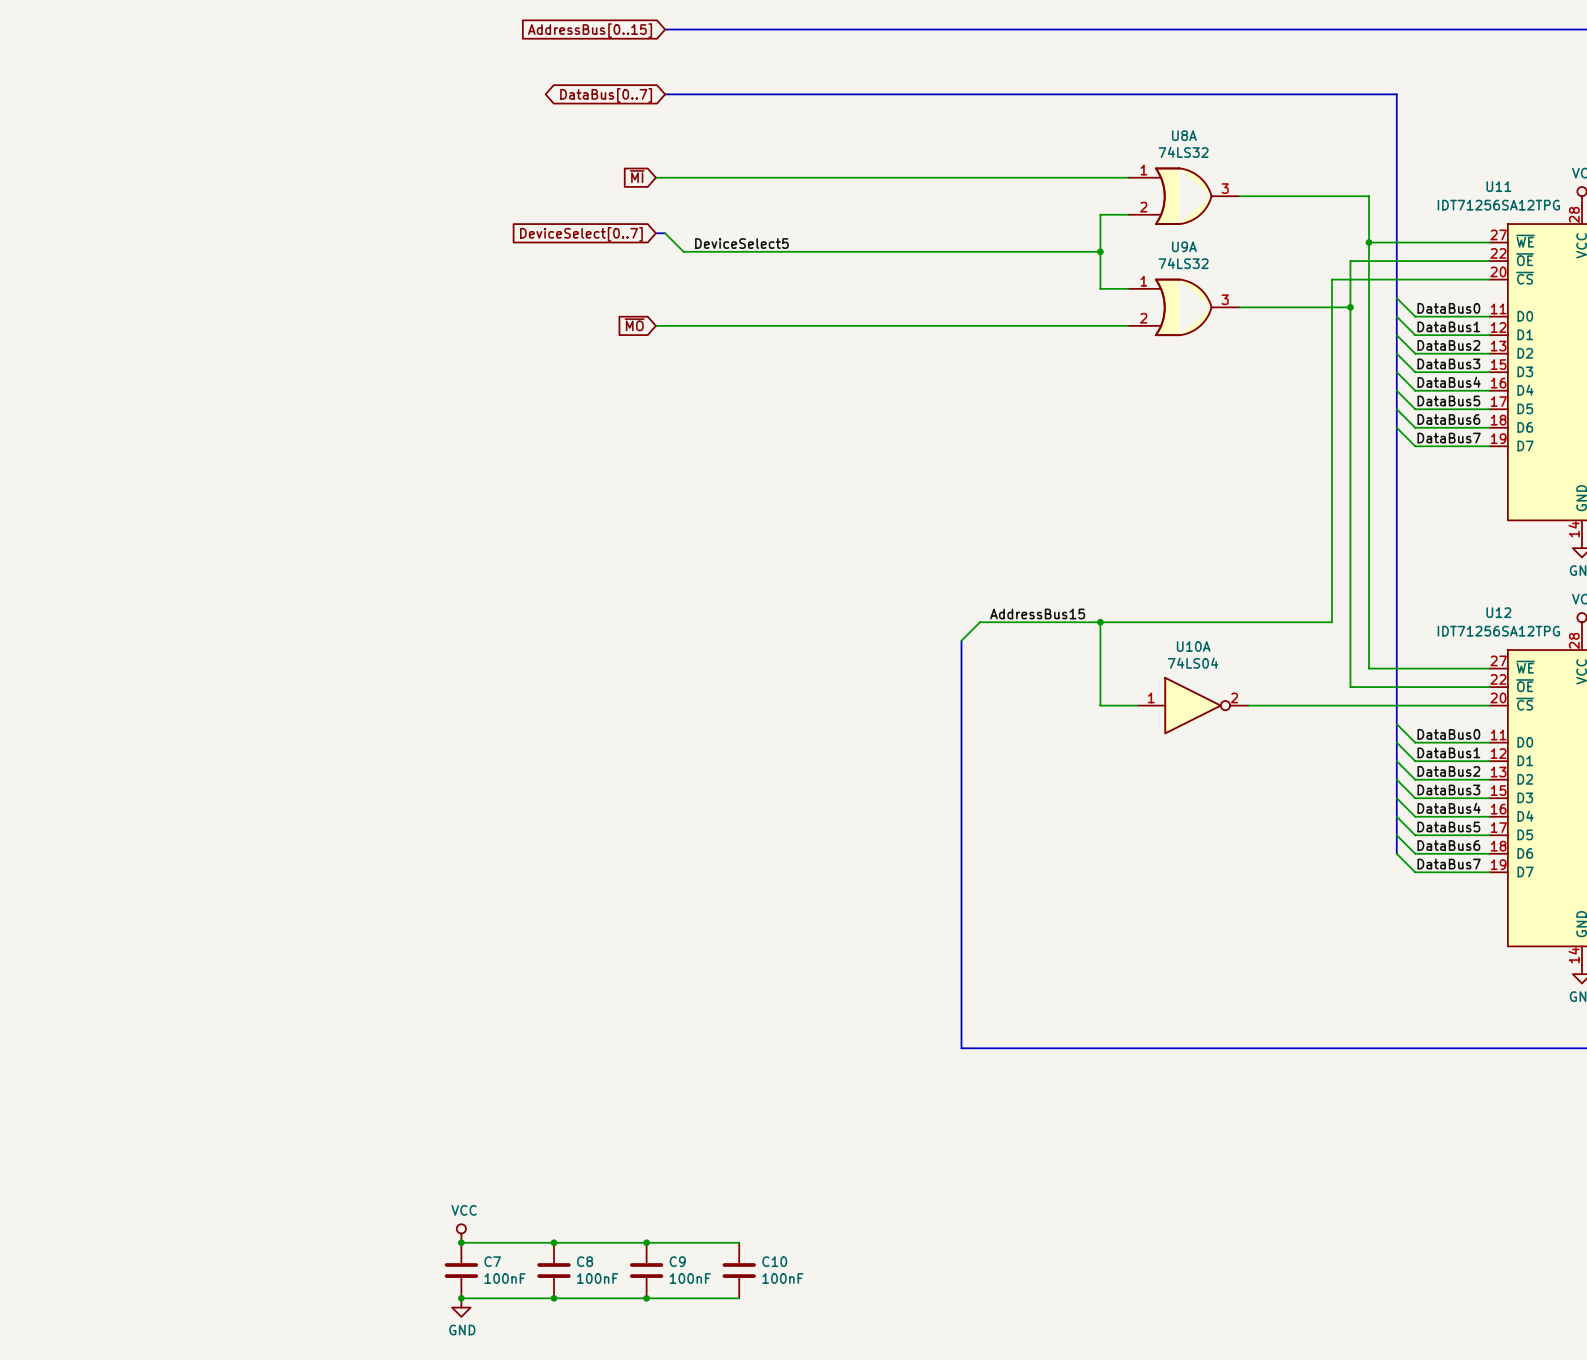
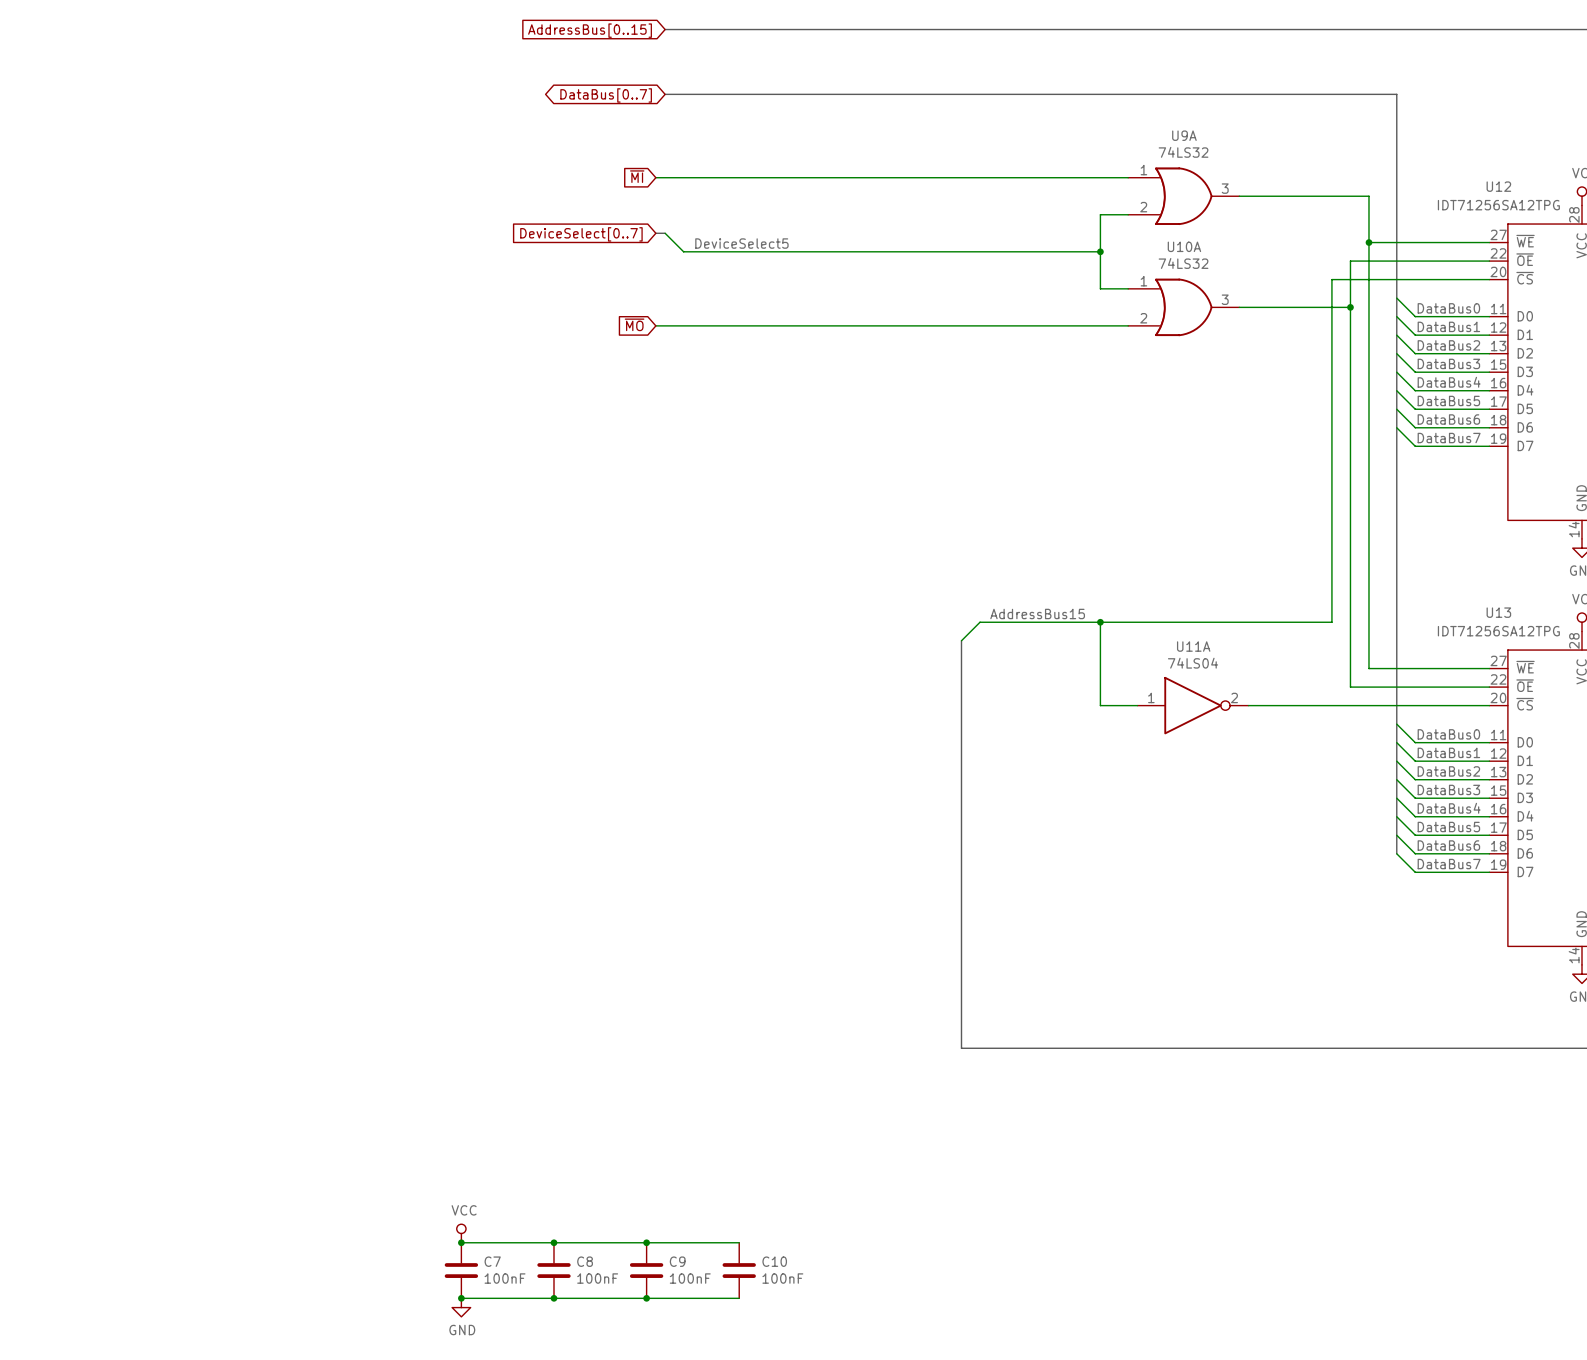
U8A name: U8A (1184, 135) -> U9A (1184, 135)
U11 name: U11 (1498, 186) -> U12 (1498, 186)
U9A name: U9A (1184, 246) -> U10A (1184, 246)
U12 name: U12 (1498, 612) -> U13 (1498, 612)
U10A name: U10A (1193, 646) -> U11A (1193, 646)

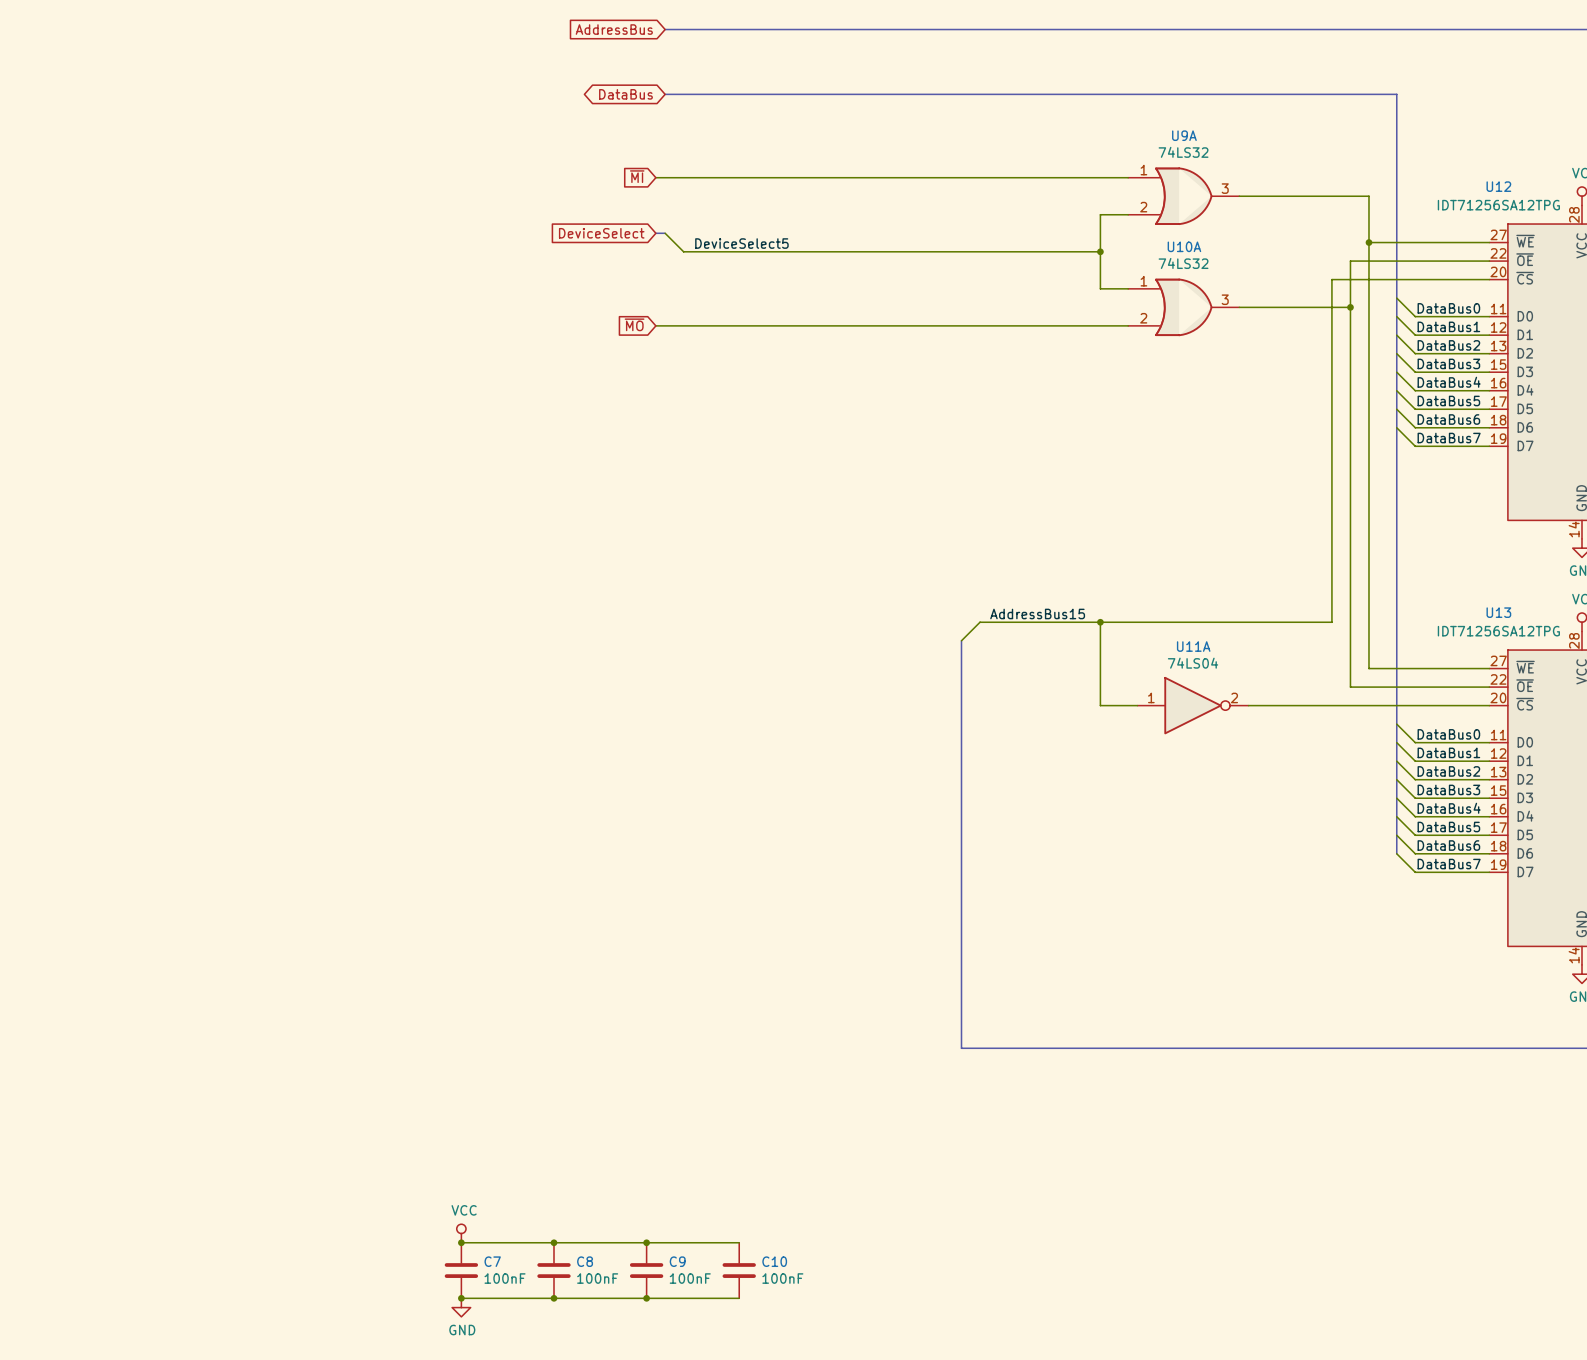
global label: AddressBus[0..15] (590, 30) -> AddressBus (614, 29)
global label: DataBus[0..7] (606, 95) -> DataBus (625, 94)
global label: DeviceSelect[0..7] (581, 234) -> DeviceSelect (601, 233)

